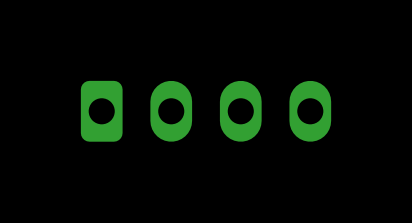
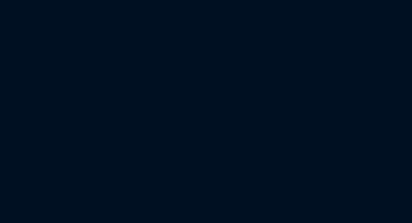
part: (206, 111) -> none

